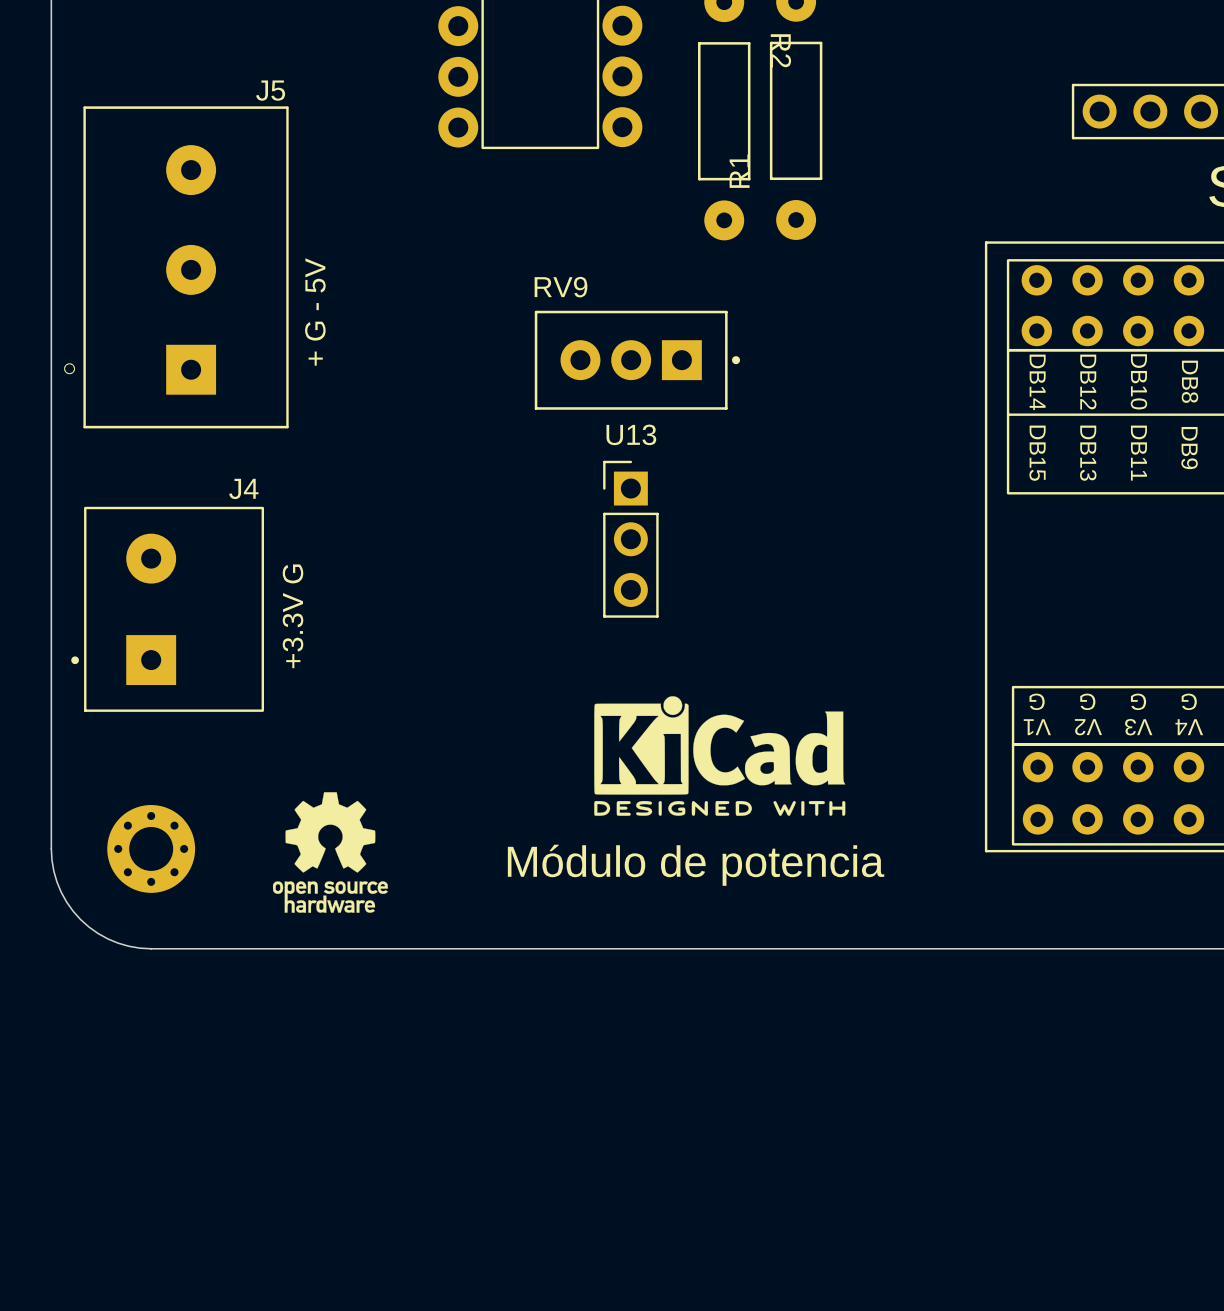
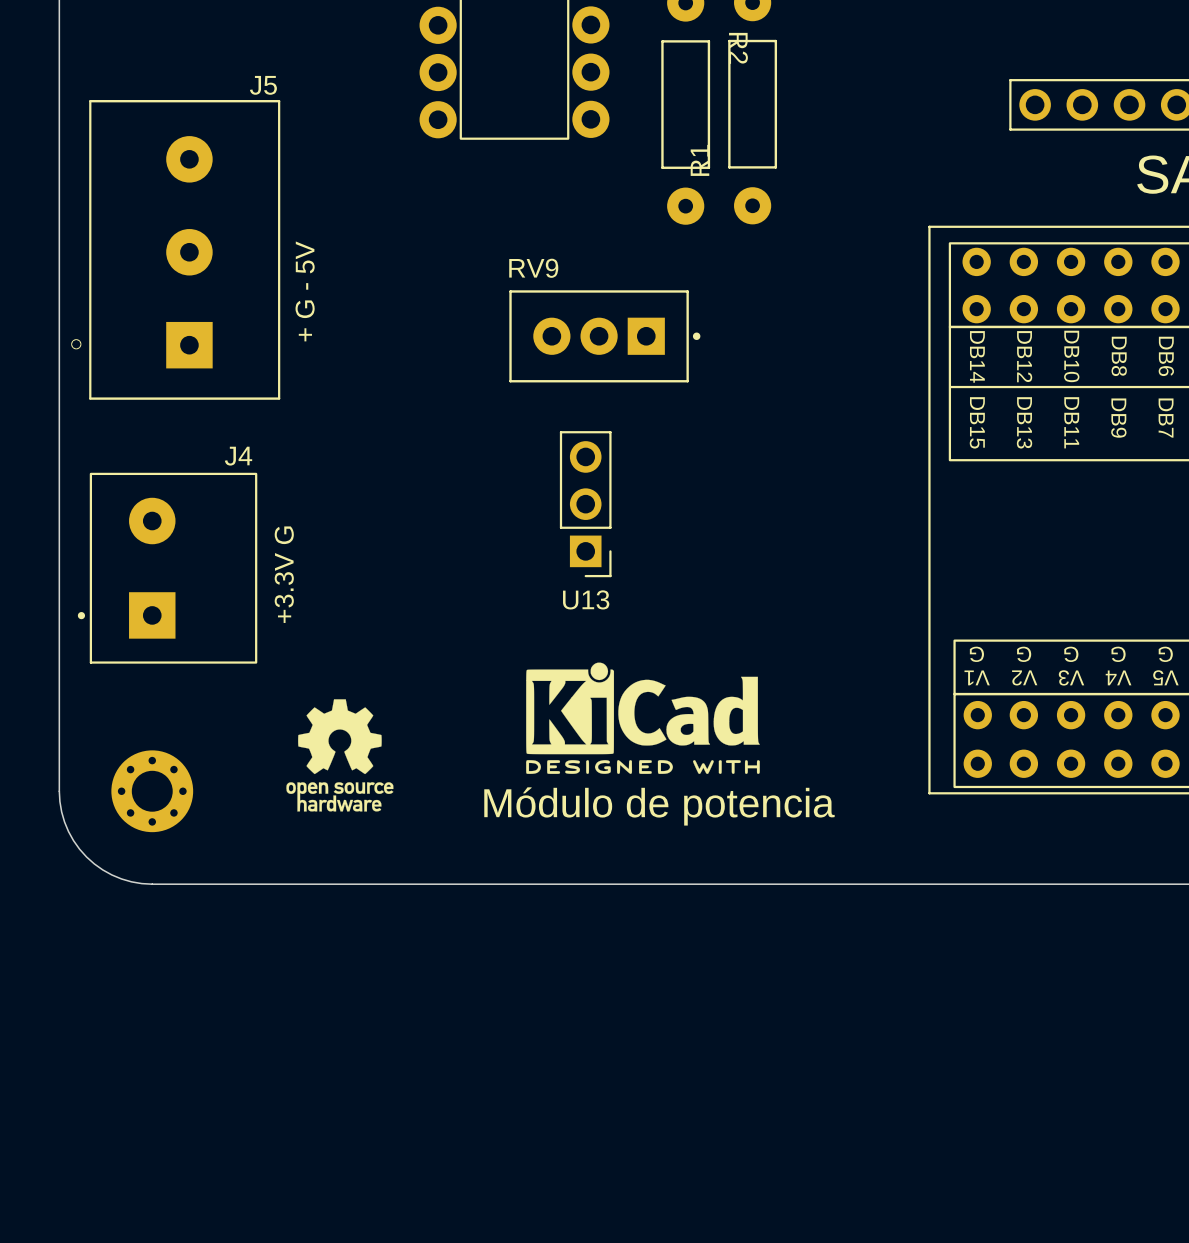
U13 rotation: 0° (630, 539) -> 180° (585, 504)
drawing position: (719, 756) -> (642, 718)
drawing position: (330, 852) -> (339, 755)

